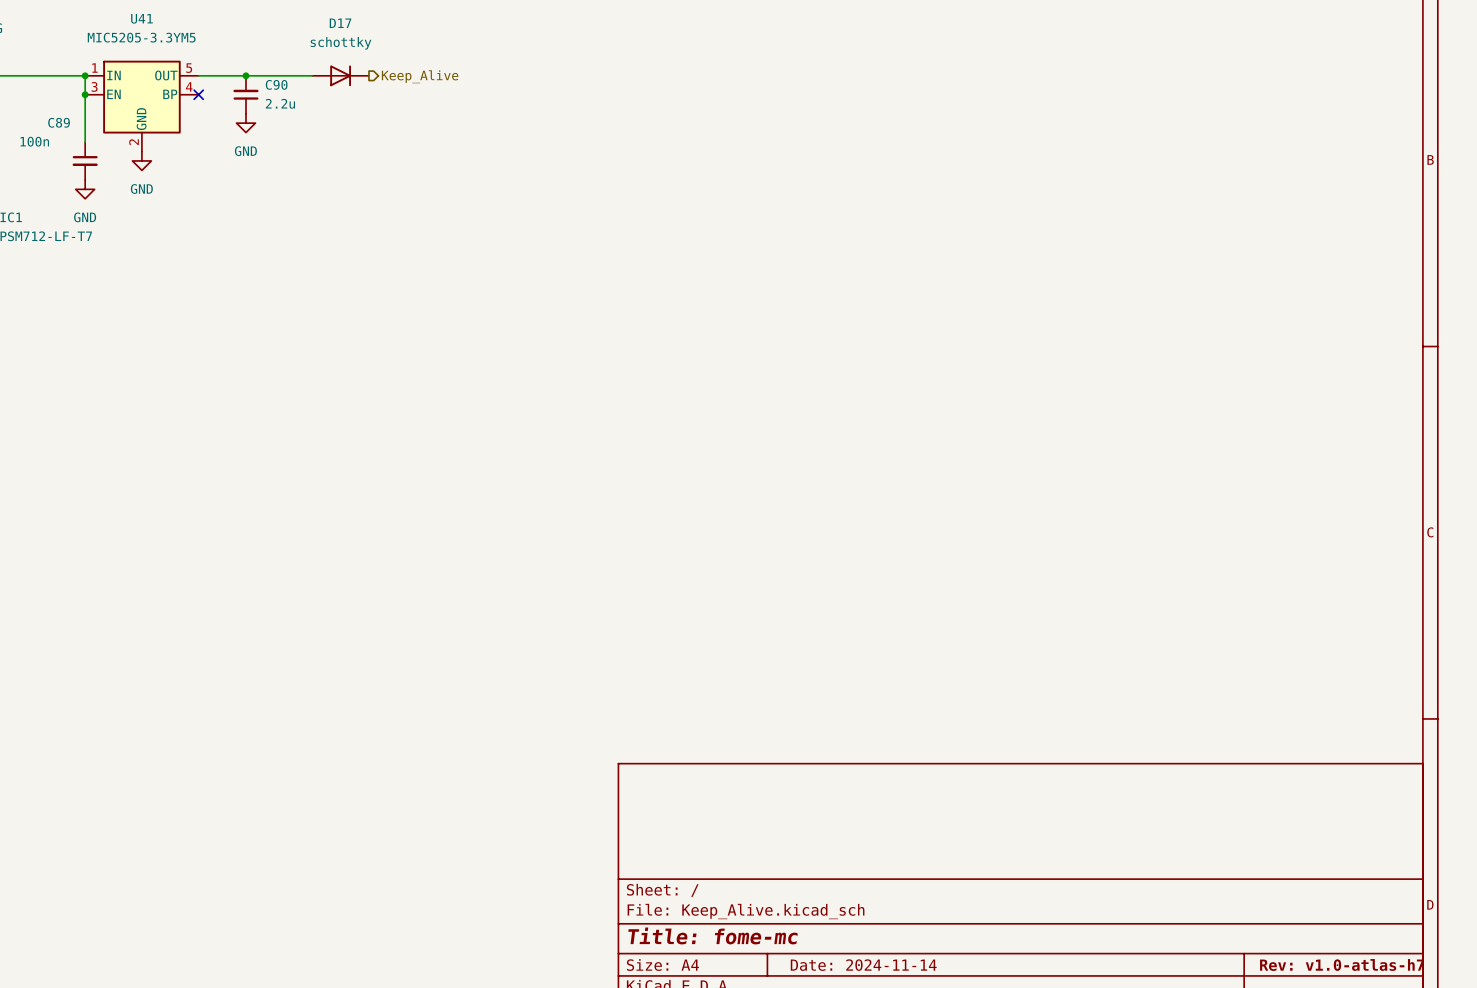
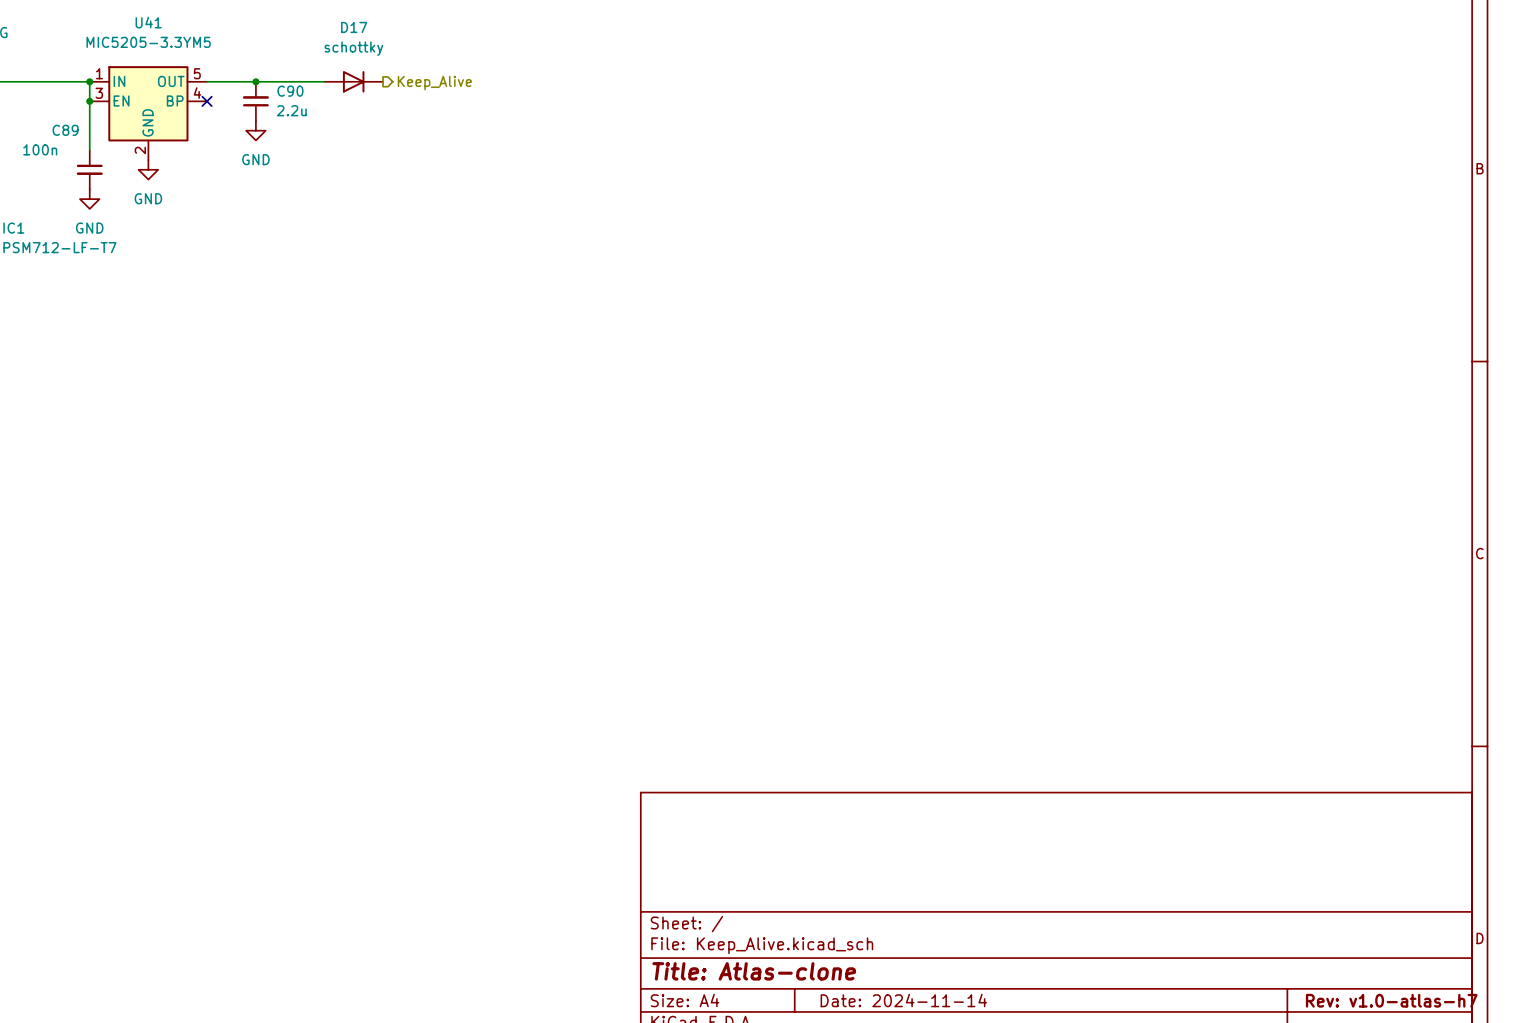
title block: Title: fome-mc (713, 935) -> Title: Atlas-clone (754, 971)

